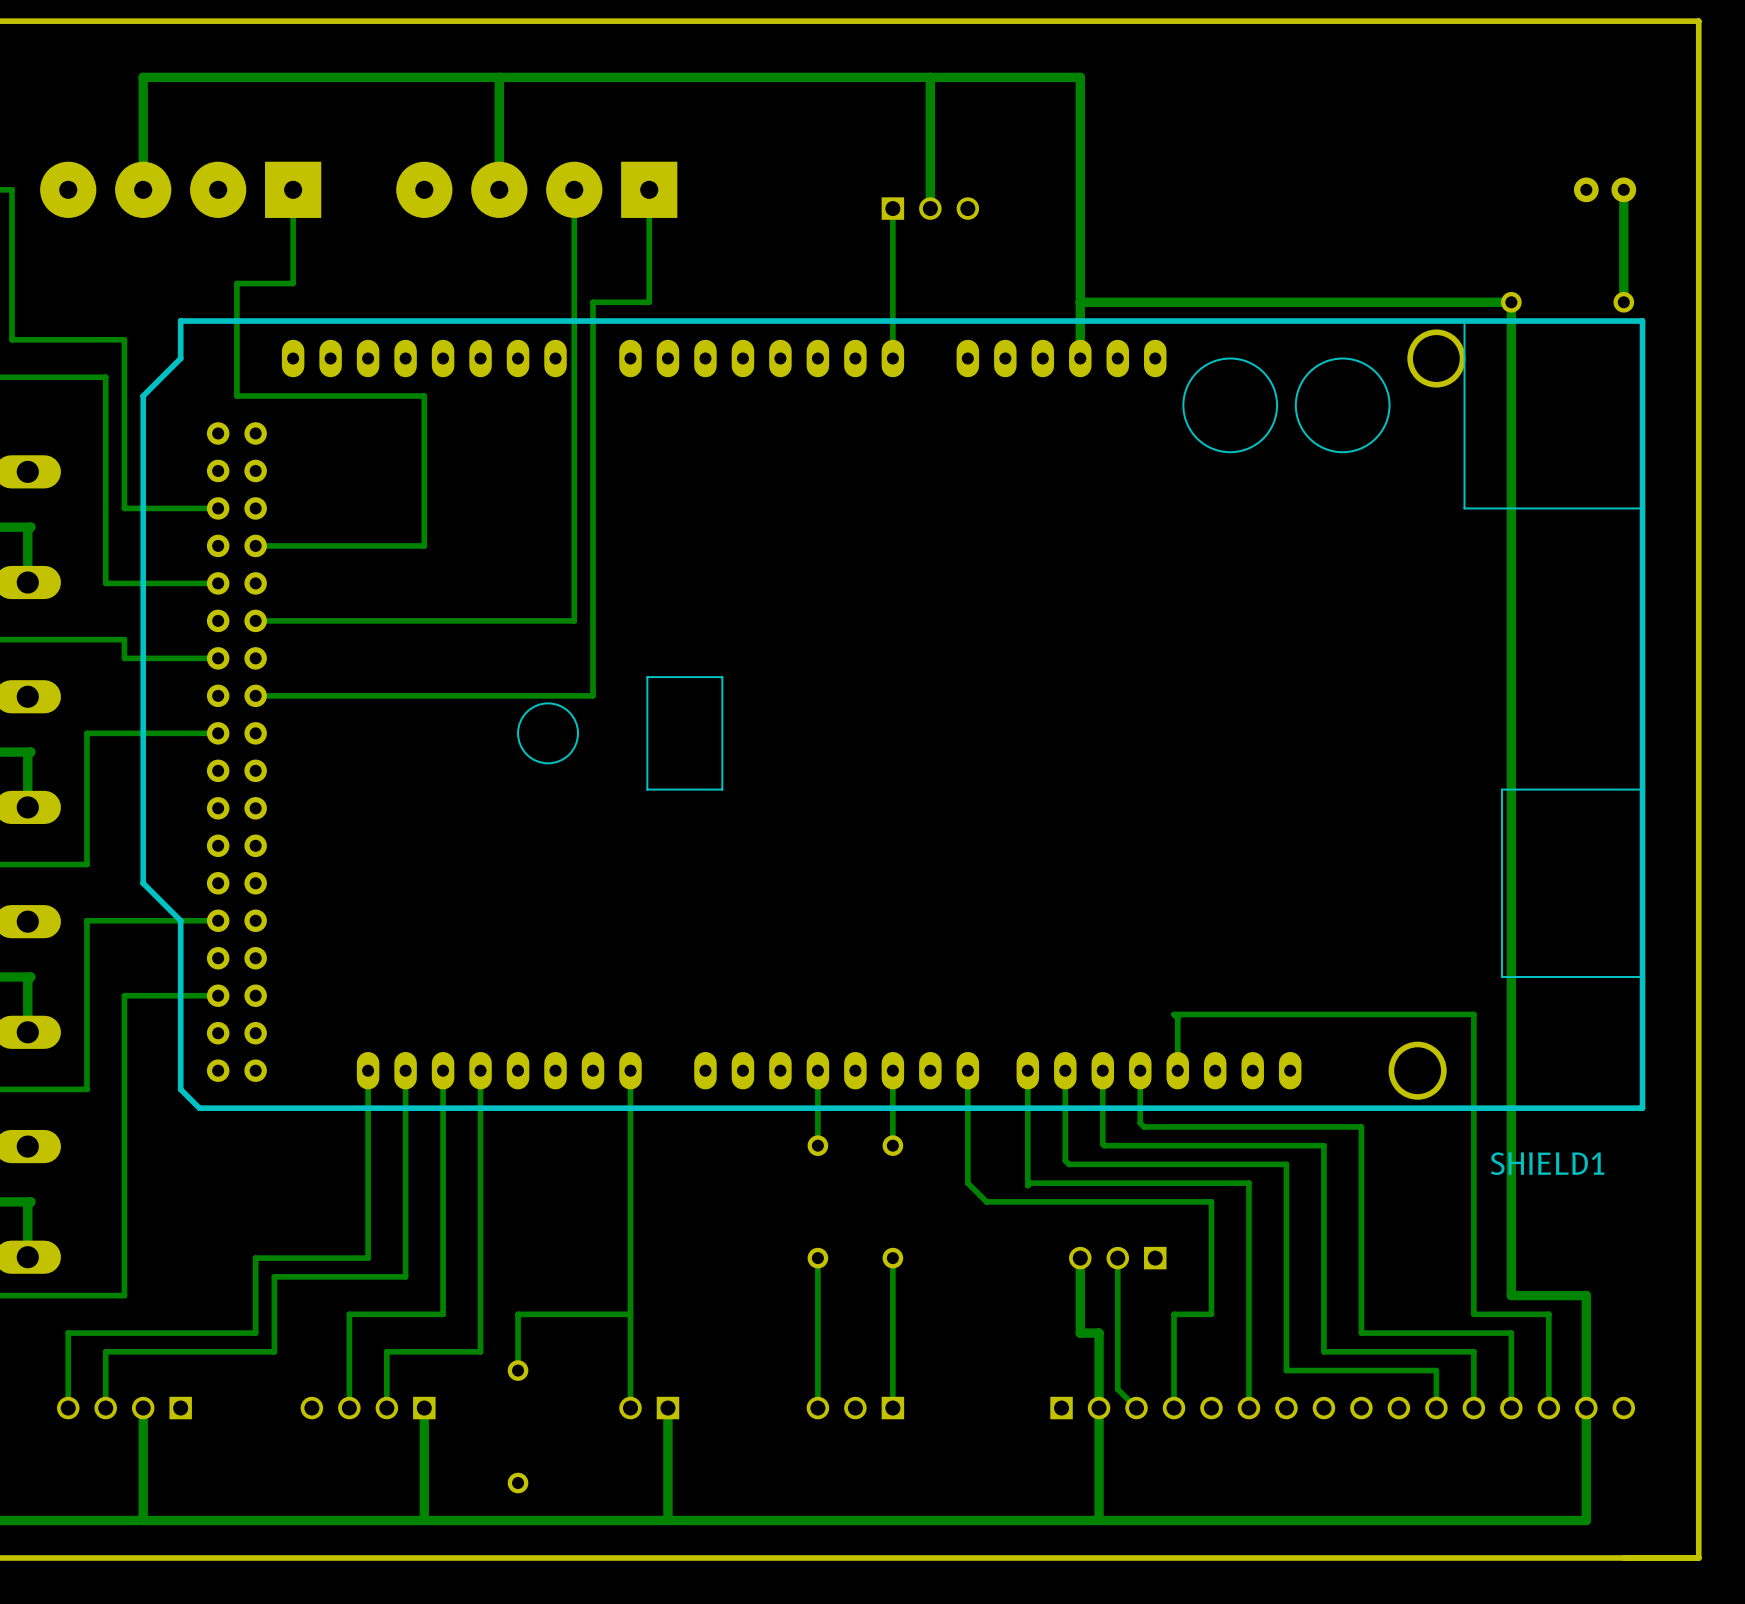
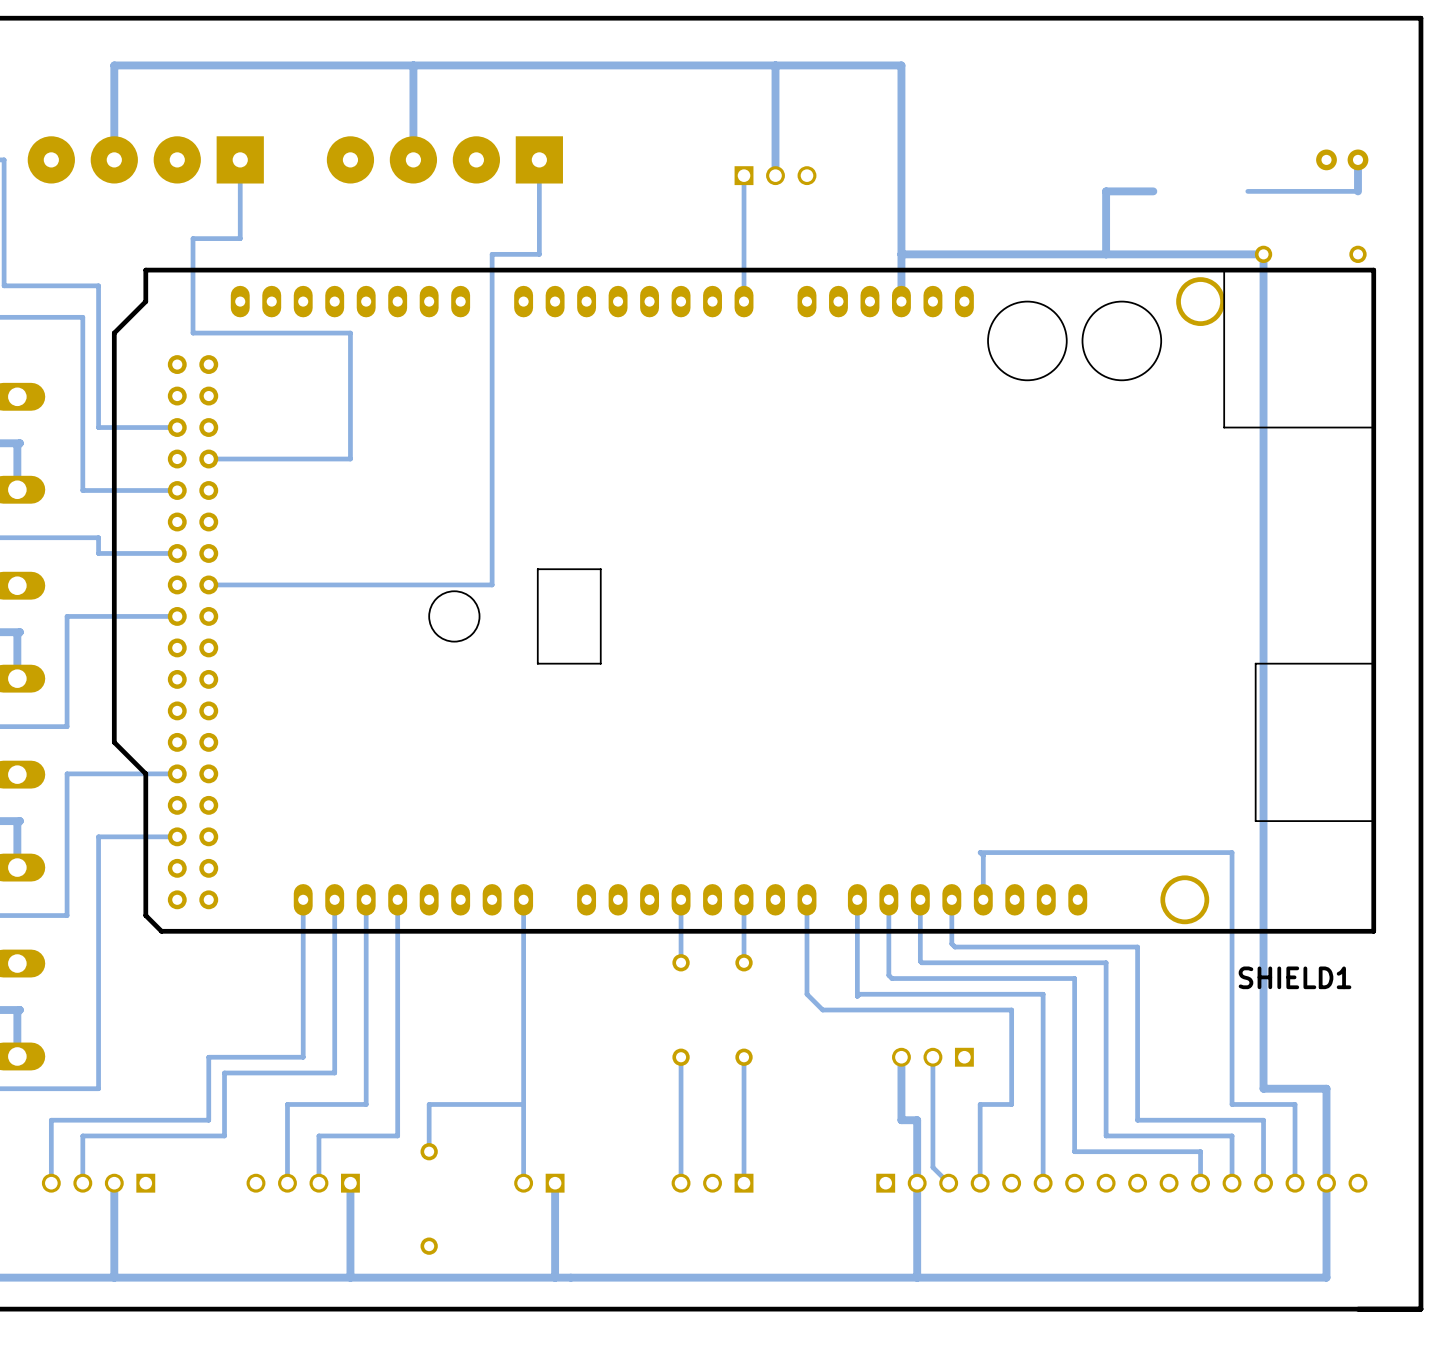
track: (574, 189) (574, 620) (255, 620) -> none
track: none -> (1153, 191) (1106, 191) (1106, 254)
track: (1623, 227) (1623, 302) -> (1357, 191) (1247, 191)

